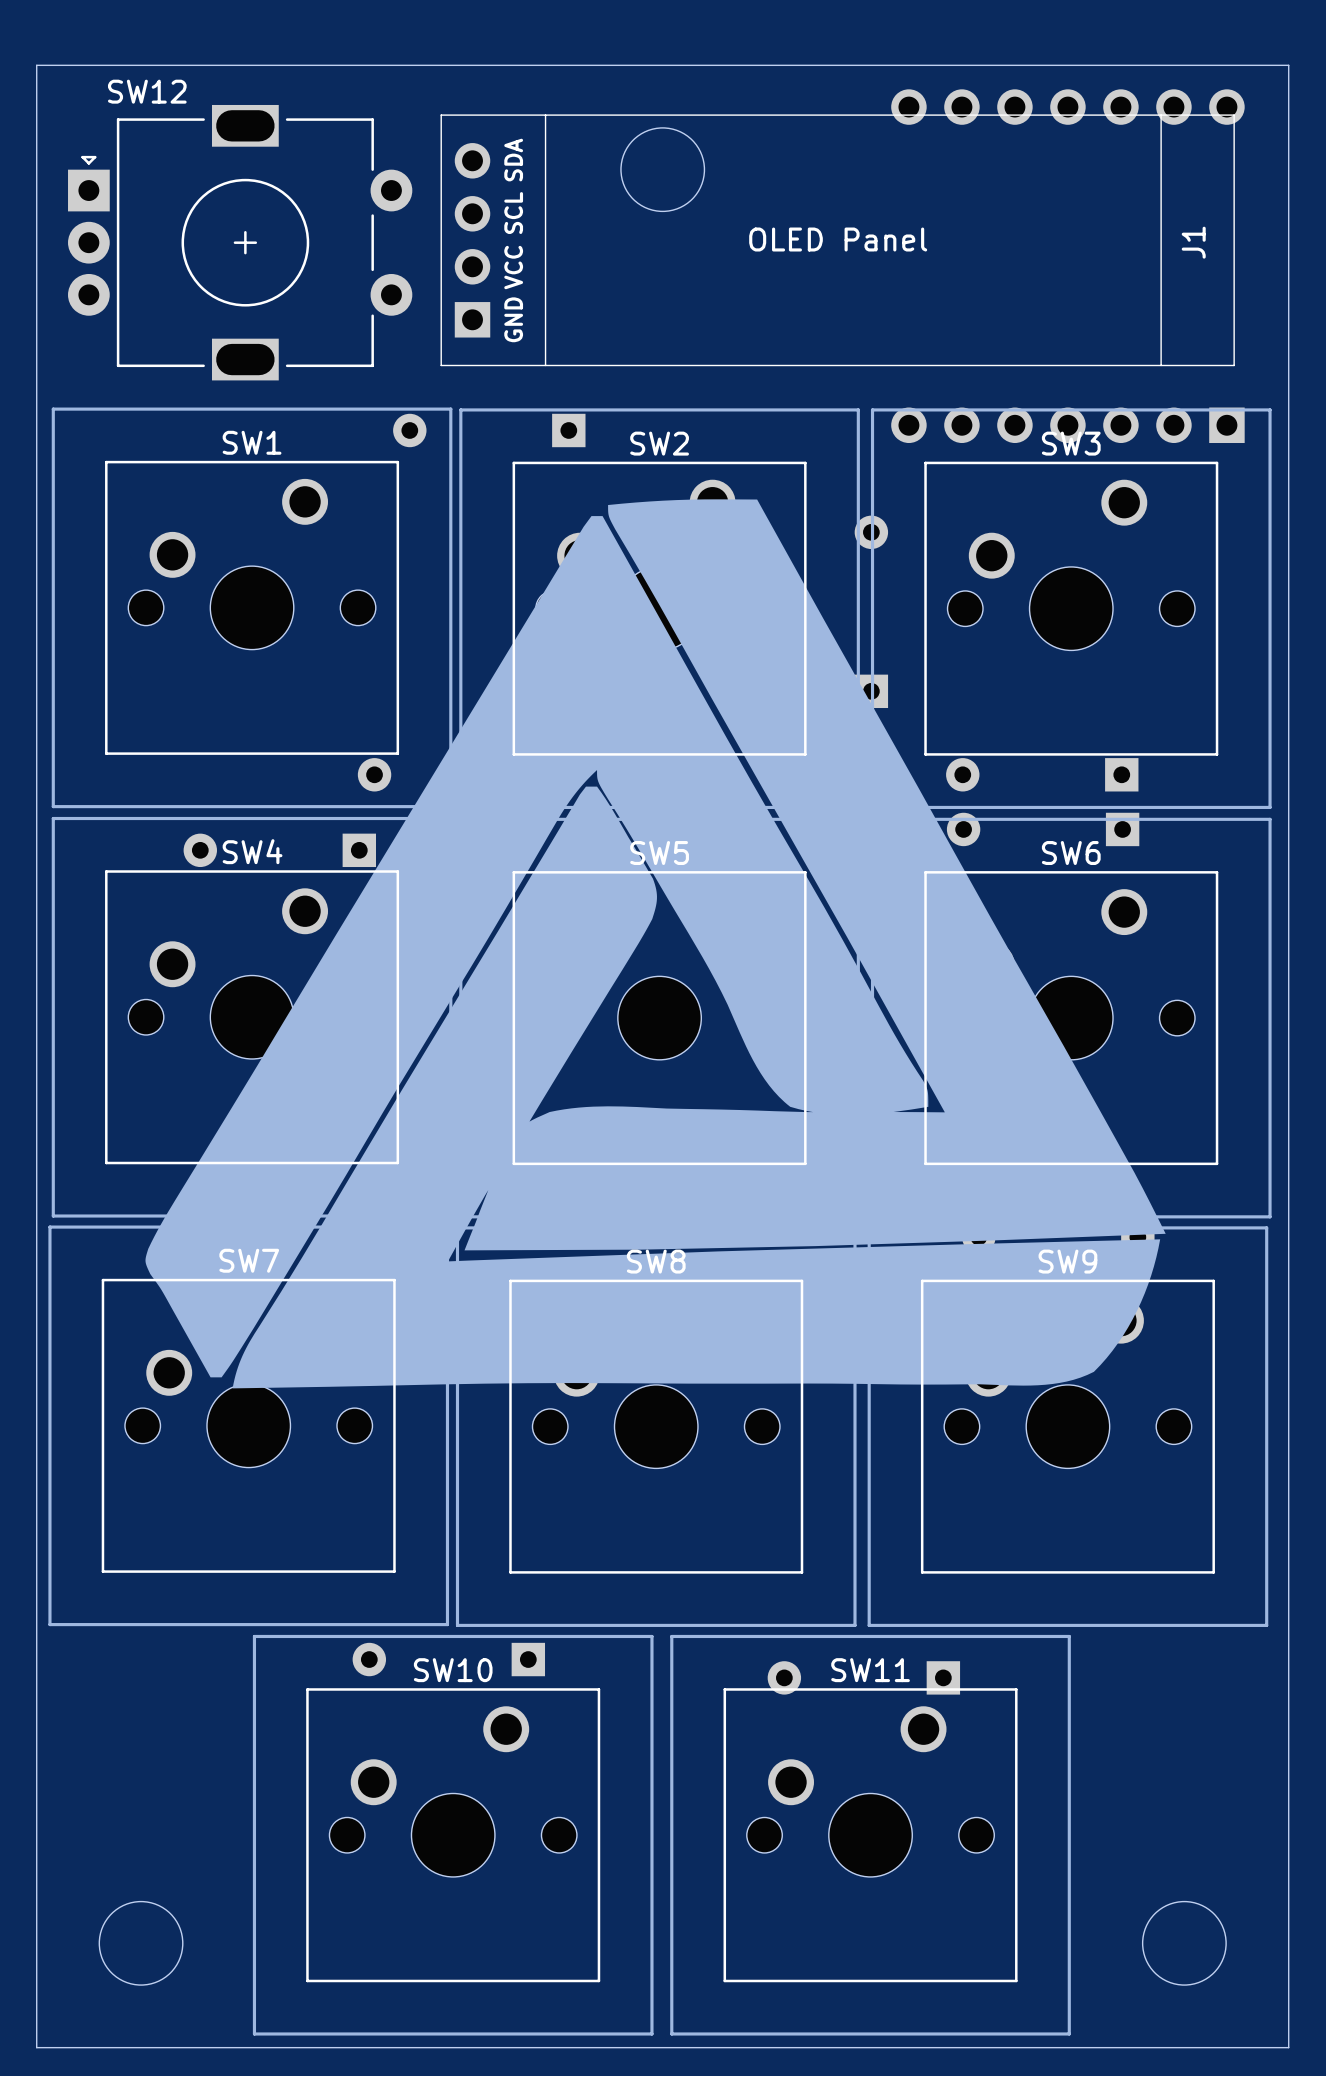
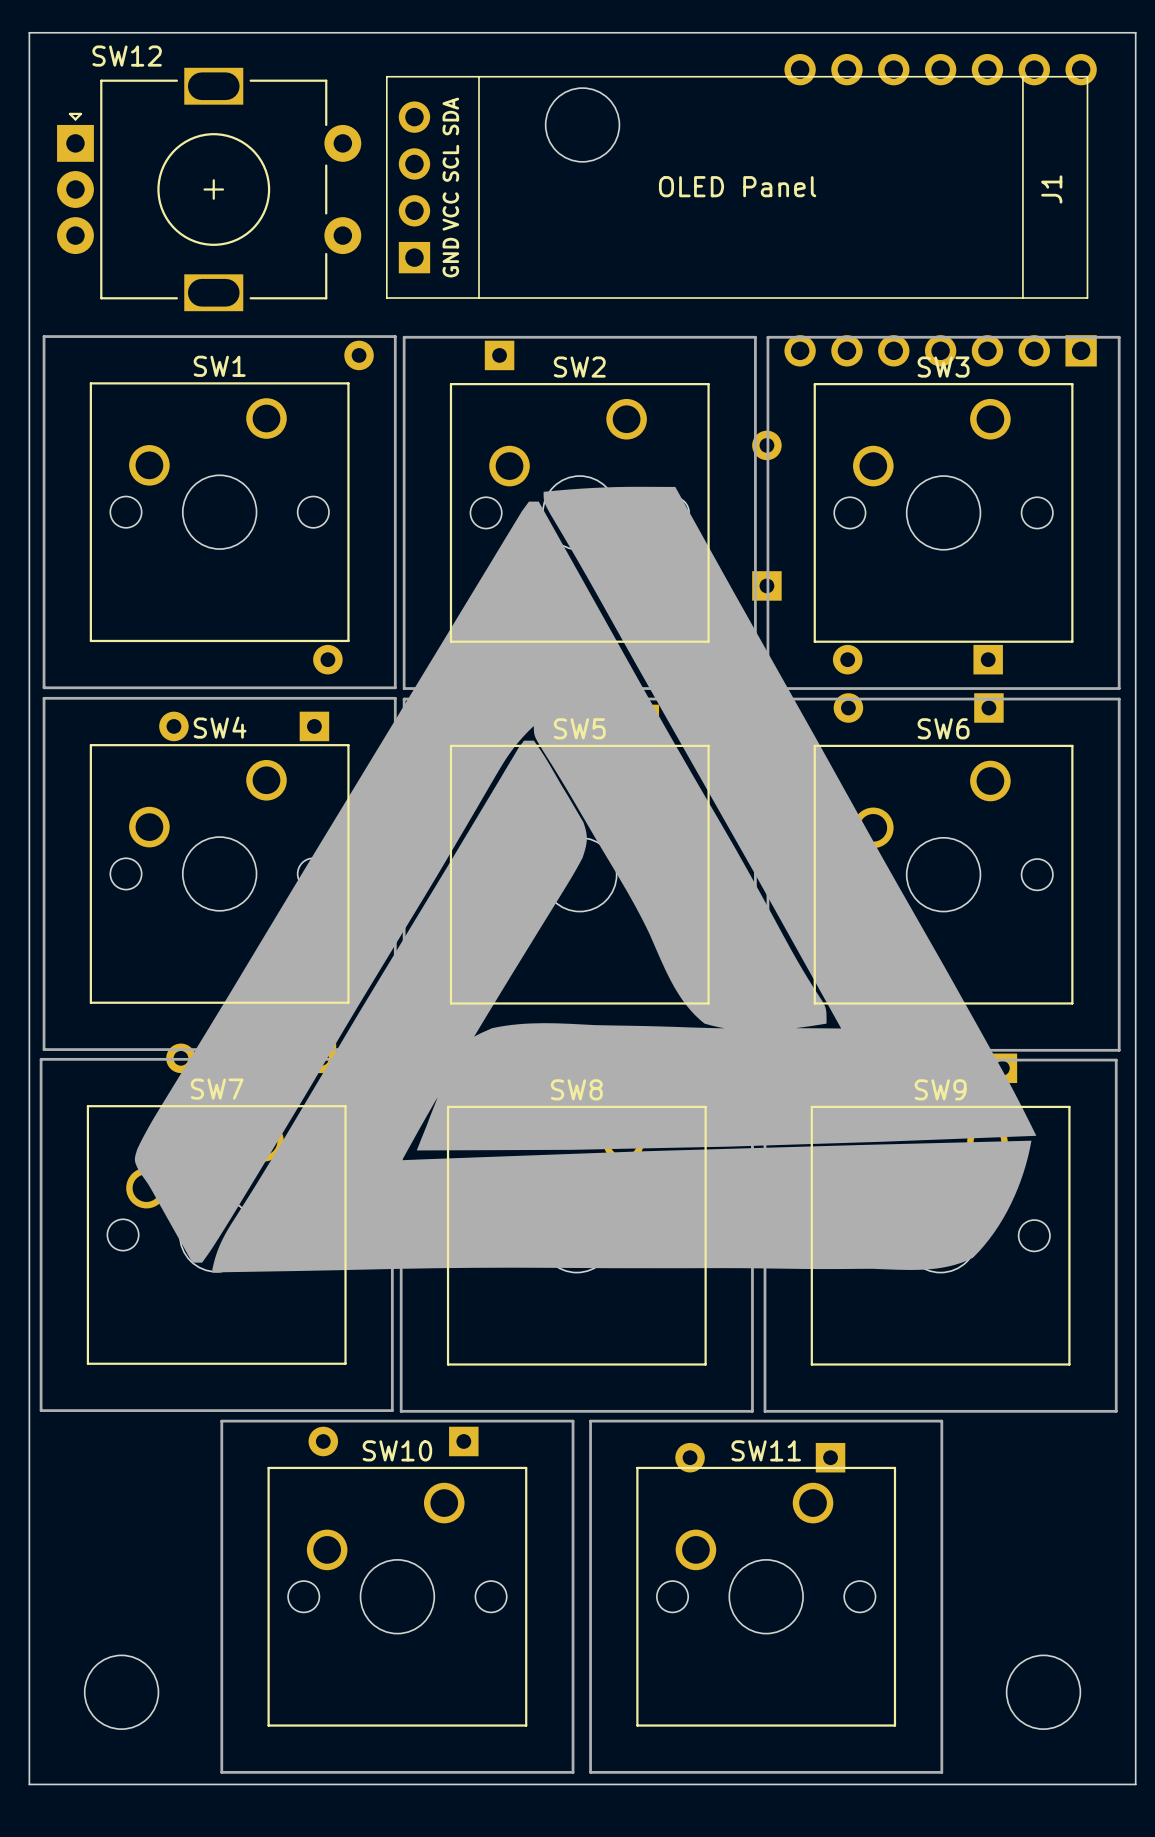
drawing position: (815, 874) -> (726, 818)
drawing position: (536, 946) -> (480, 882)
drawing position: (696, 1087) -> (621, 1006)

